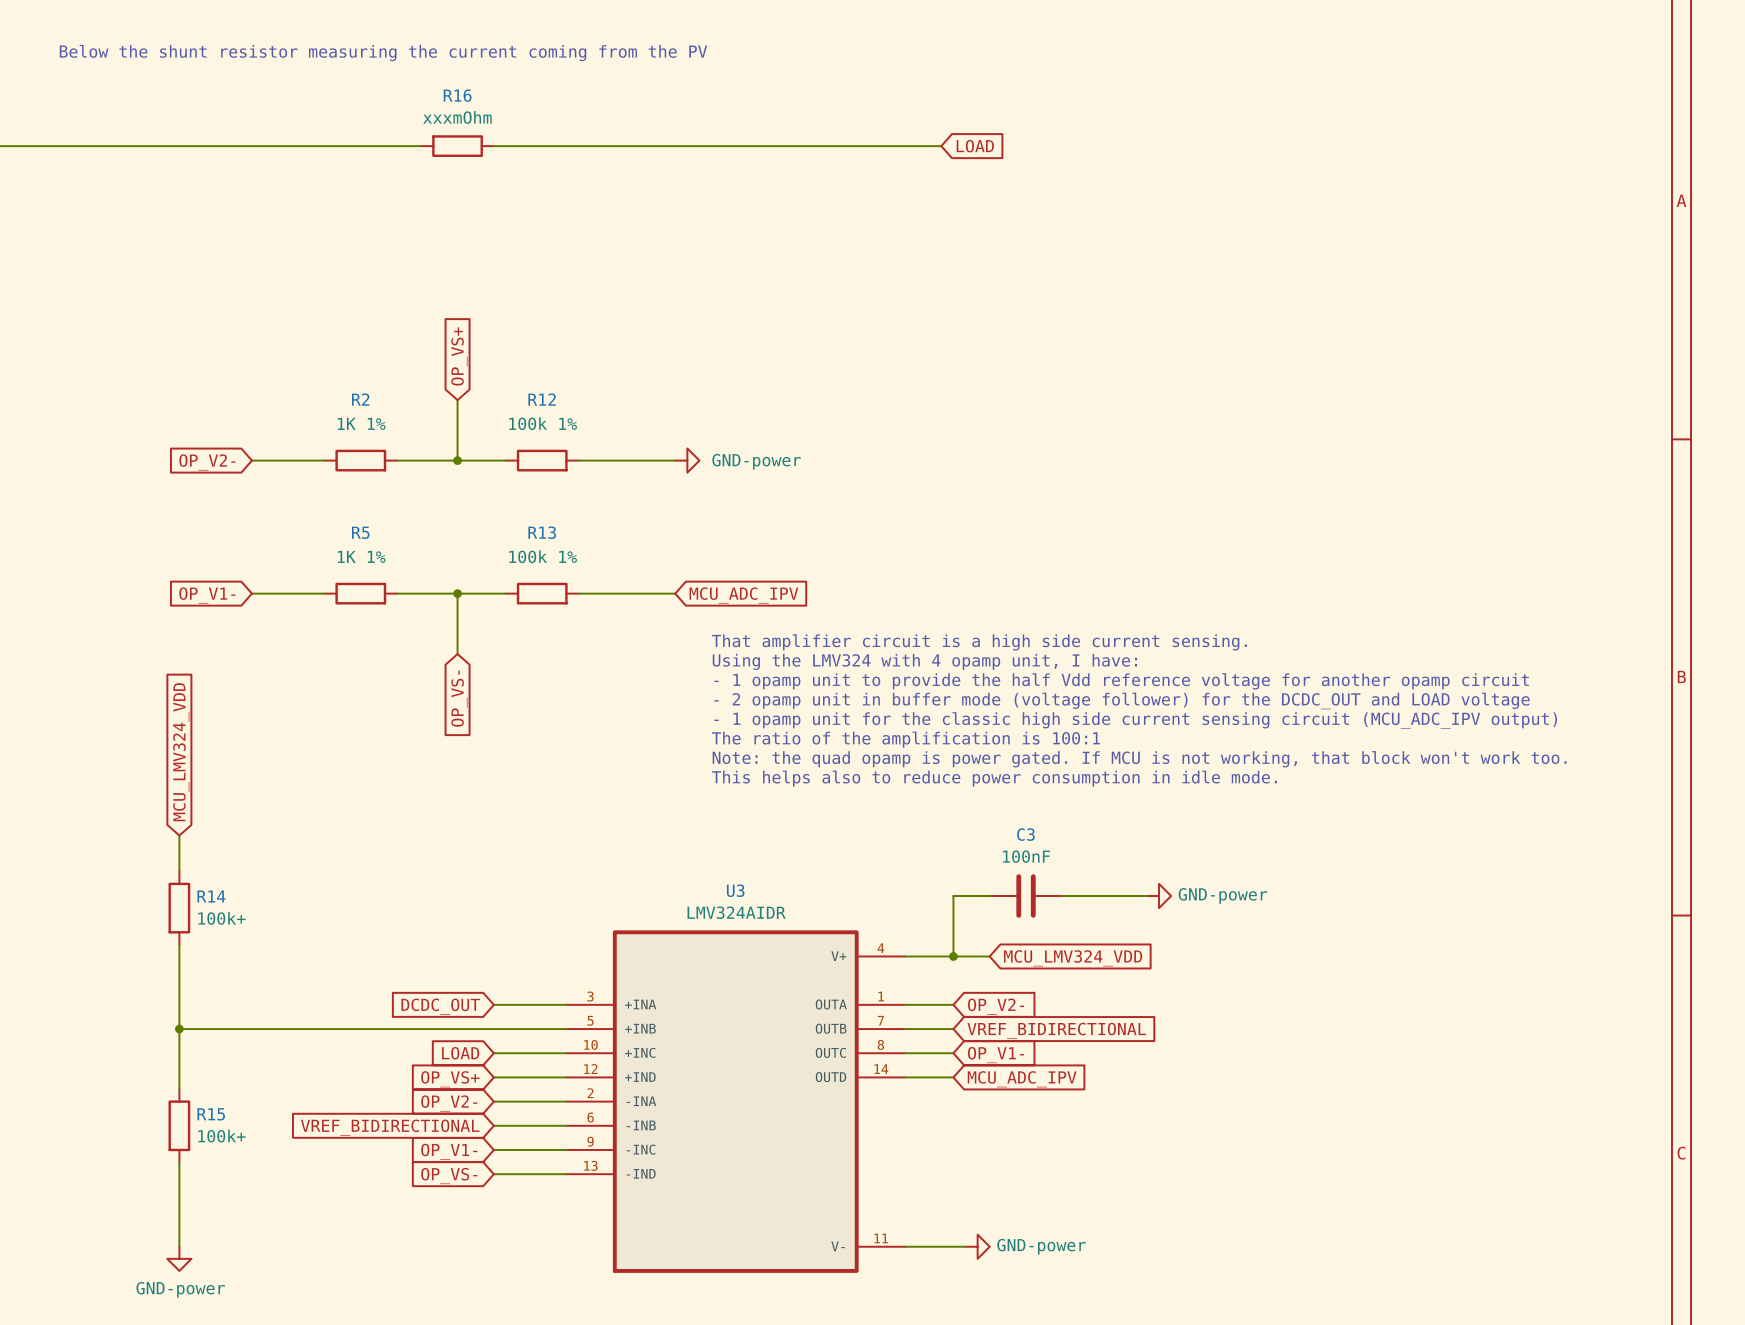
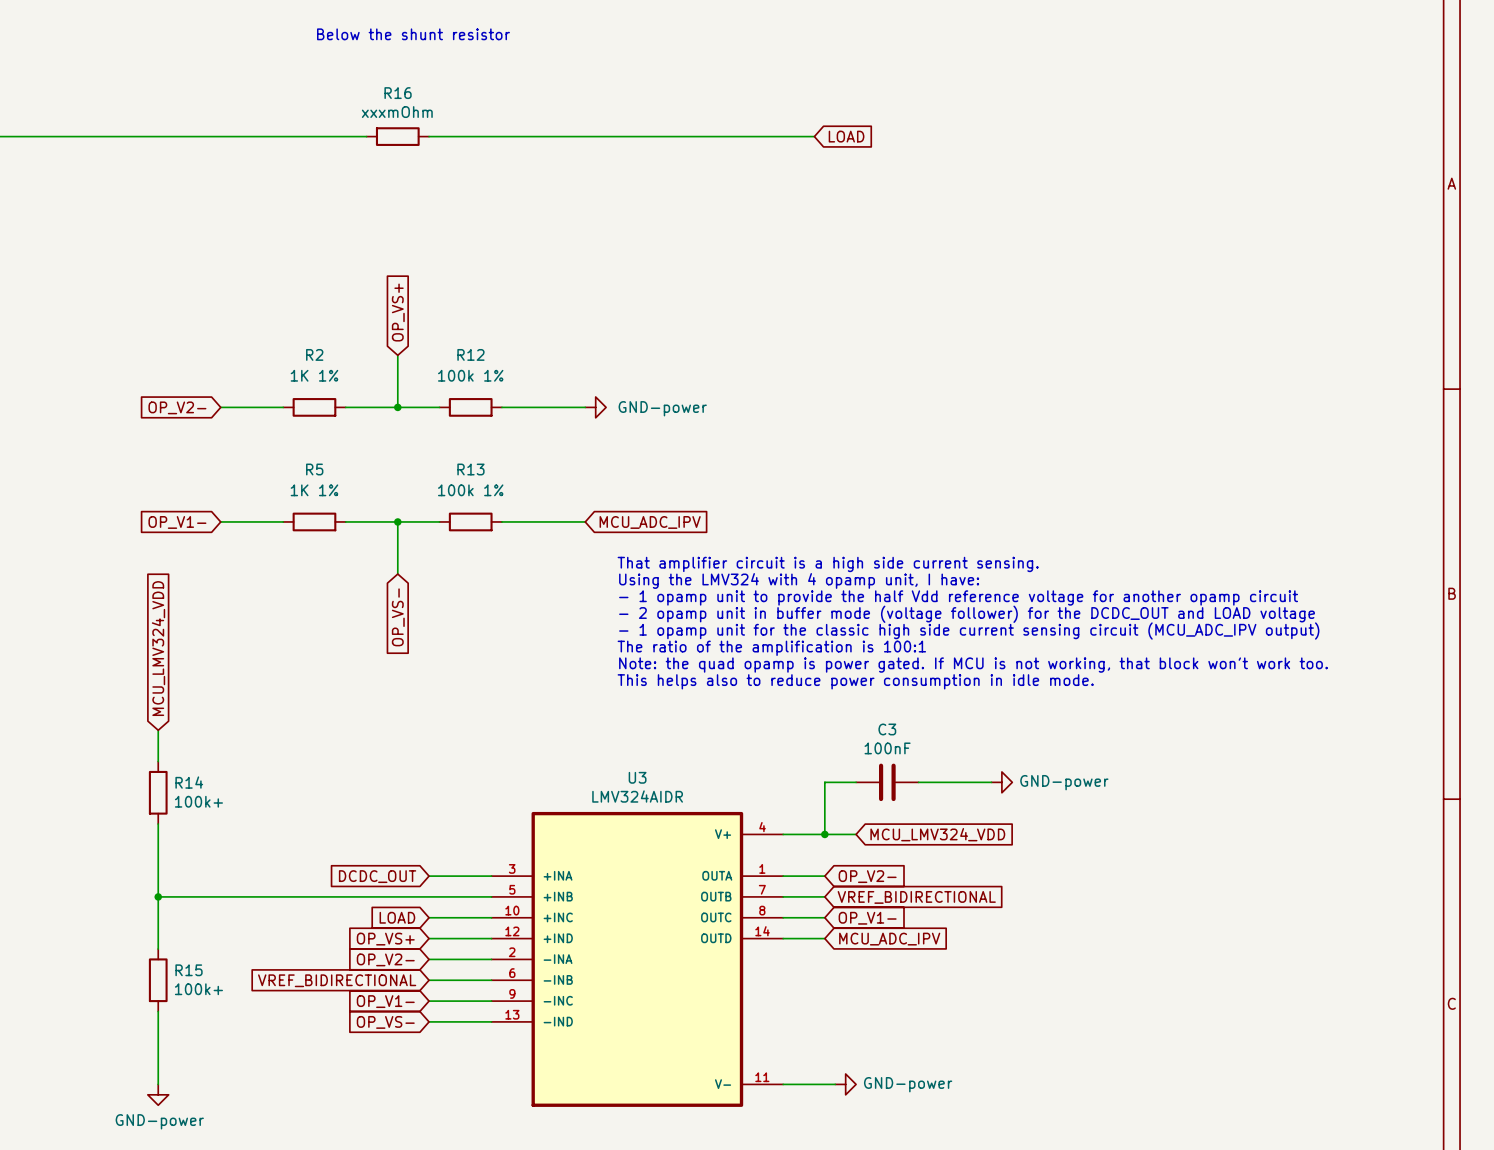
text: none -> Below the shunt resistor (413, 34)
text: Below the shunt resistor measuring the current coming from the PV (383, 53) -> none

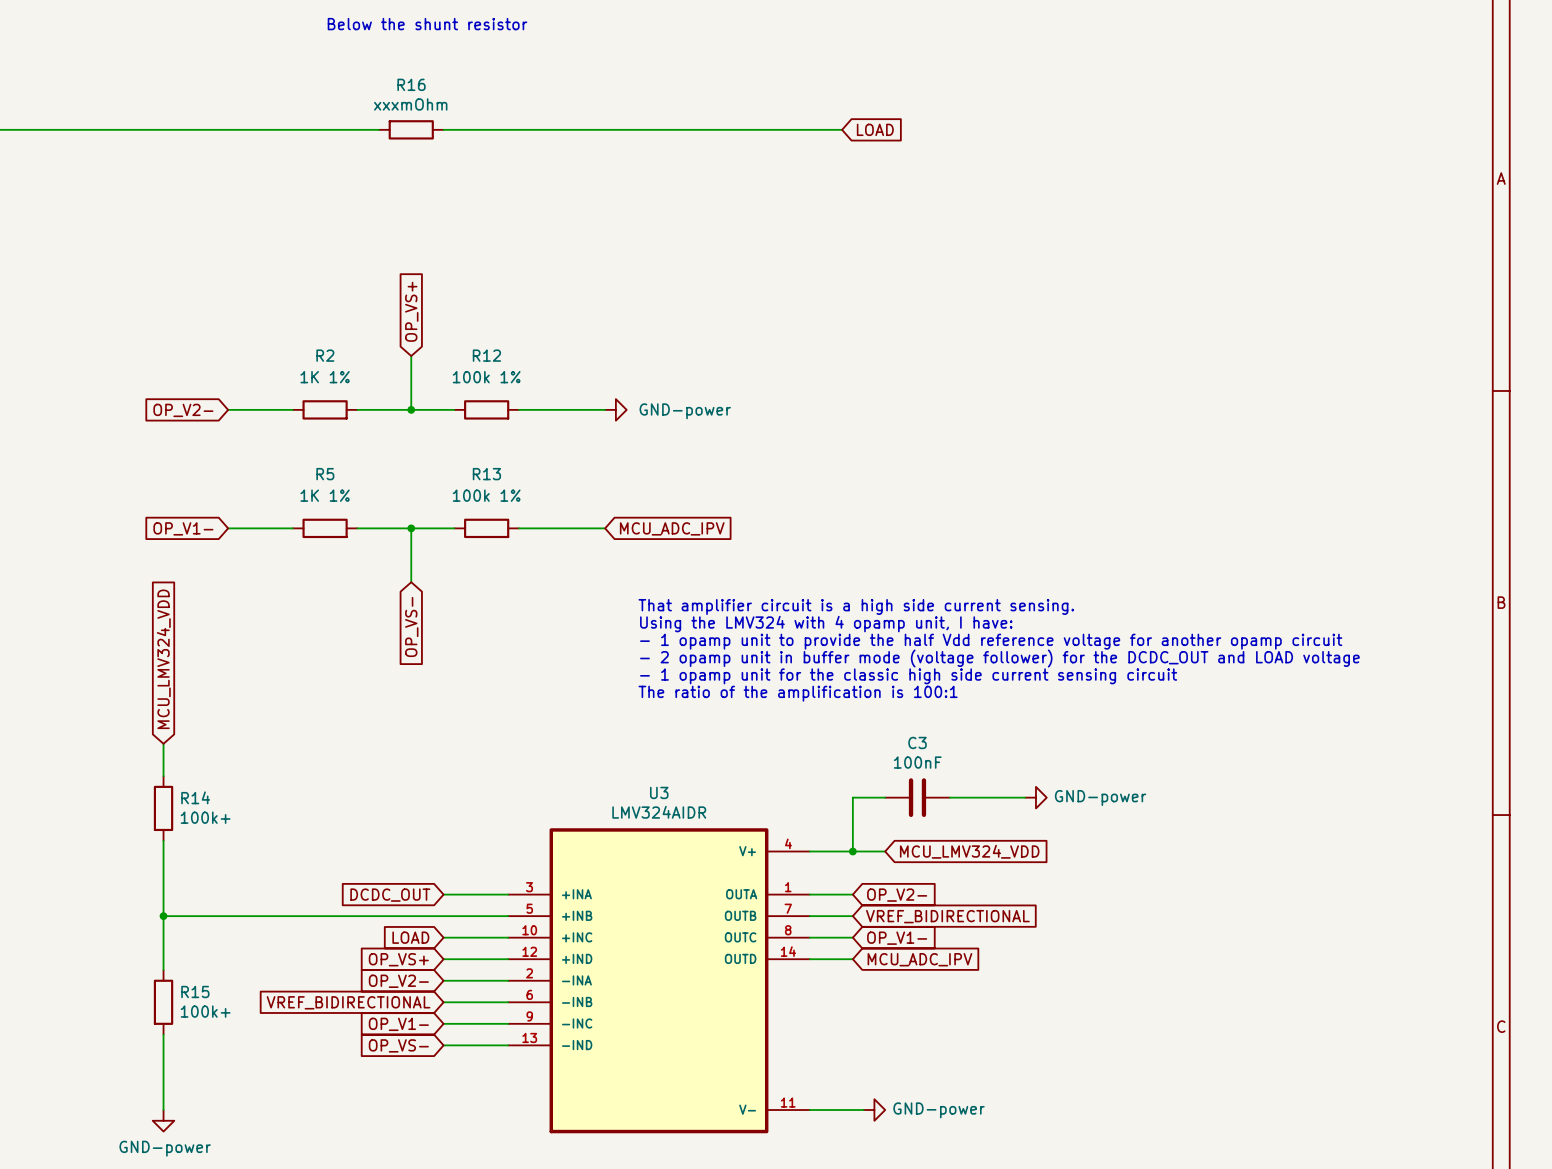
text: That amplifier circuit is a high side current sensing. (828, 564) -> none
text: Using the LMV324 with 4 opamp unit, I have: (799, 580) -> none
text: - 1 opamp unit to provide the half Vdd reference voltage for another opamp circuit (958, 597) -> That amplifier circuit is a high side current sensing. (856, 606)
text: - 2 opamp unit in buffer mode (voltage follower) for the DCDC_OUT and LOAD voltage (967, 614) -> Using the LMV324 with 4 opamp unit, I have: (826, 624)
text: - 1 opamp unit for the classic high side current sensing circuit (MCU_ADC_IPV output) (969, 631) -> - 1 opamp unit to provide the half Vdd reference voltage for another opamp circuit (991, 641)
text: The ratio of the amplification is 100:1 (771, 648) -> - 2 opamp unit in buffer mode (voltage follower) for the DCDC_OUT and LOAD voltage (999, 658)
text: Note: the quad opamp is power gated. If MCU is not working, that block won't work too. (973, 665) -> - 1 opamp unit for the classic high side current sensing circuit (908, 676)
text: This helps also to reduce power consumption in idle mode. (855, 681) -> The ratio of the amplification is 100:1 (798, 693)

